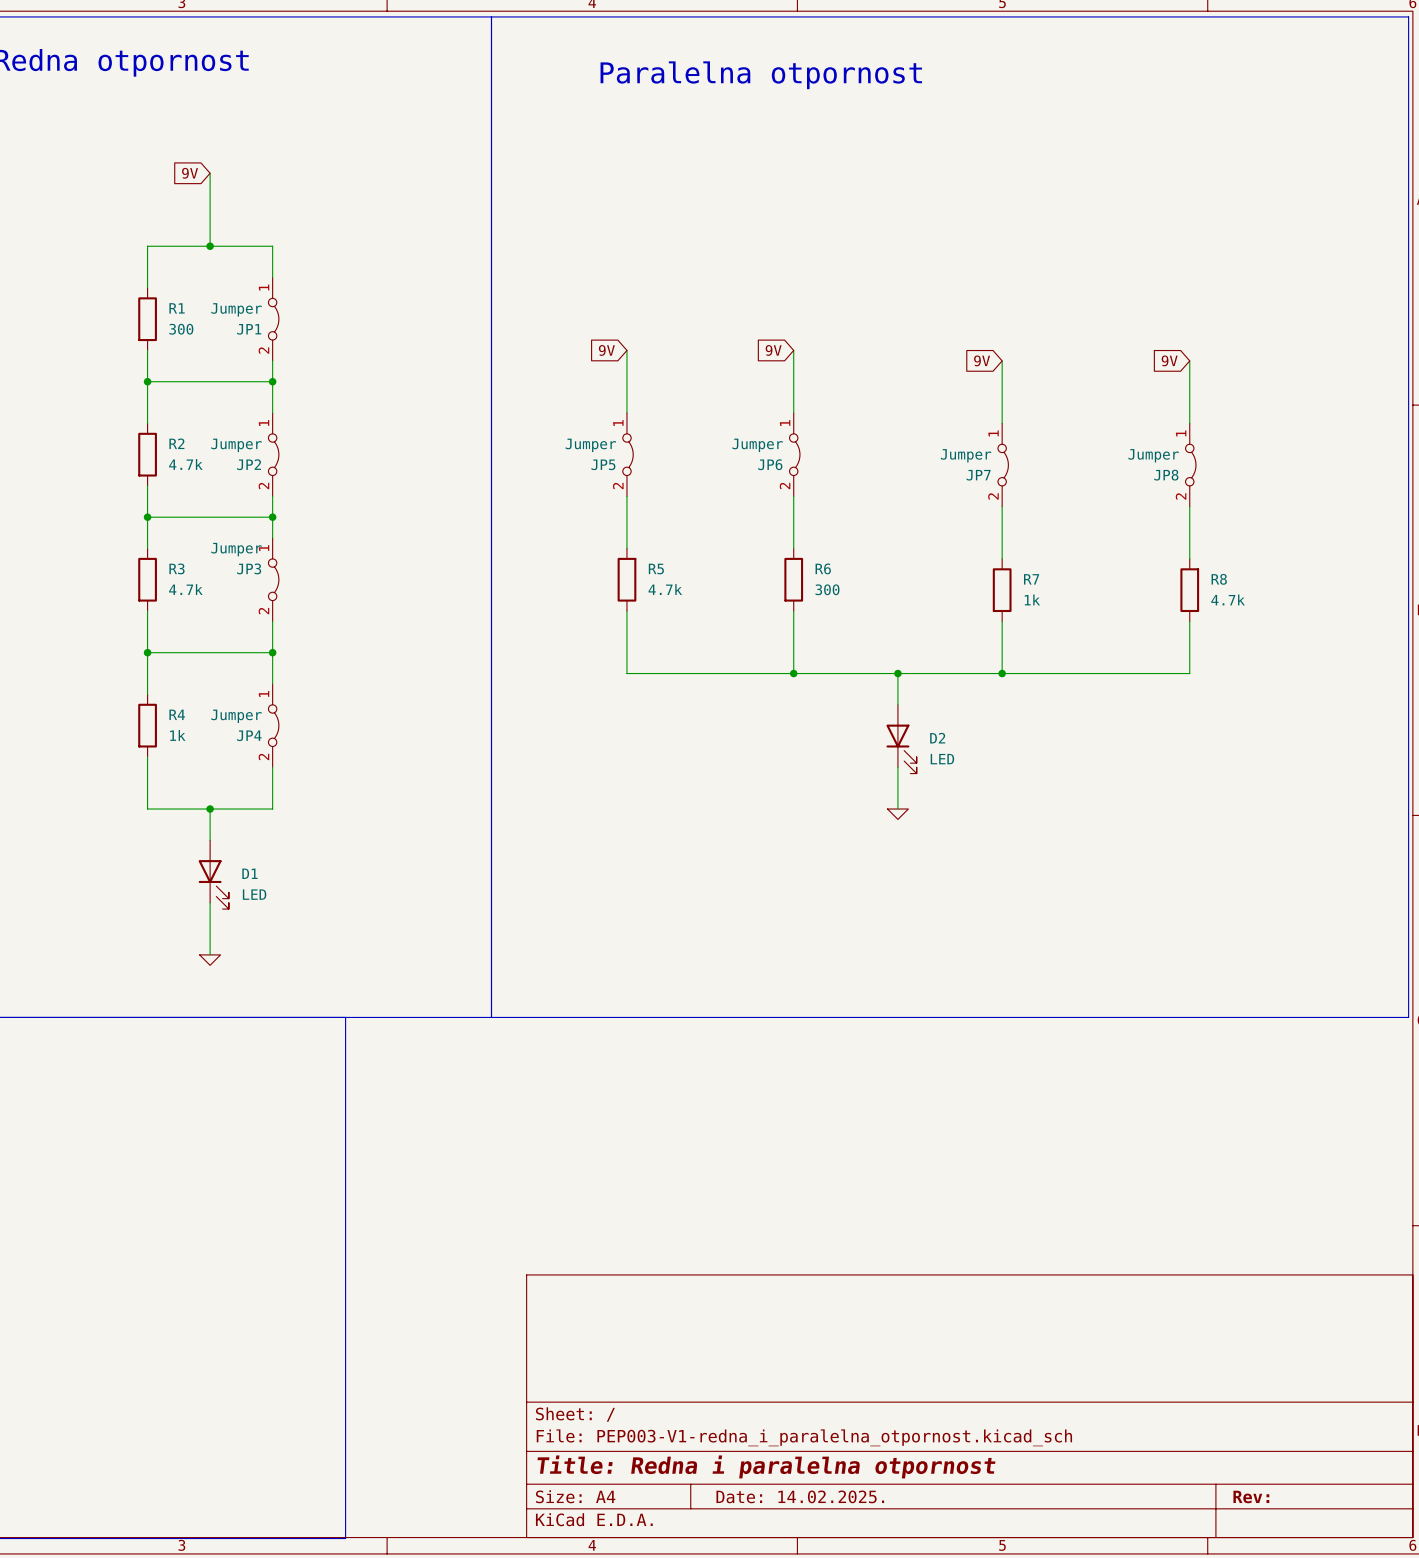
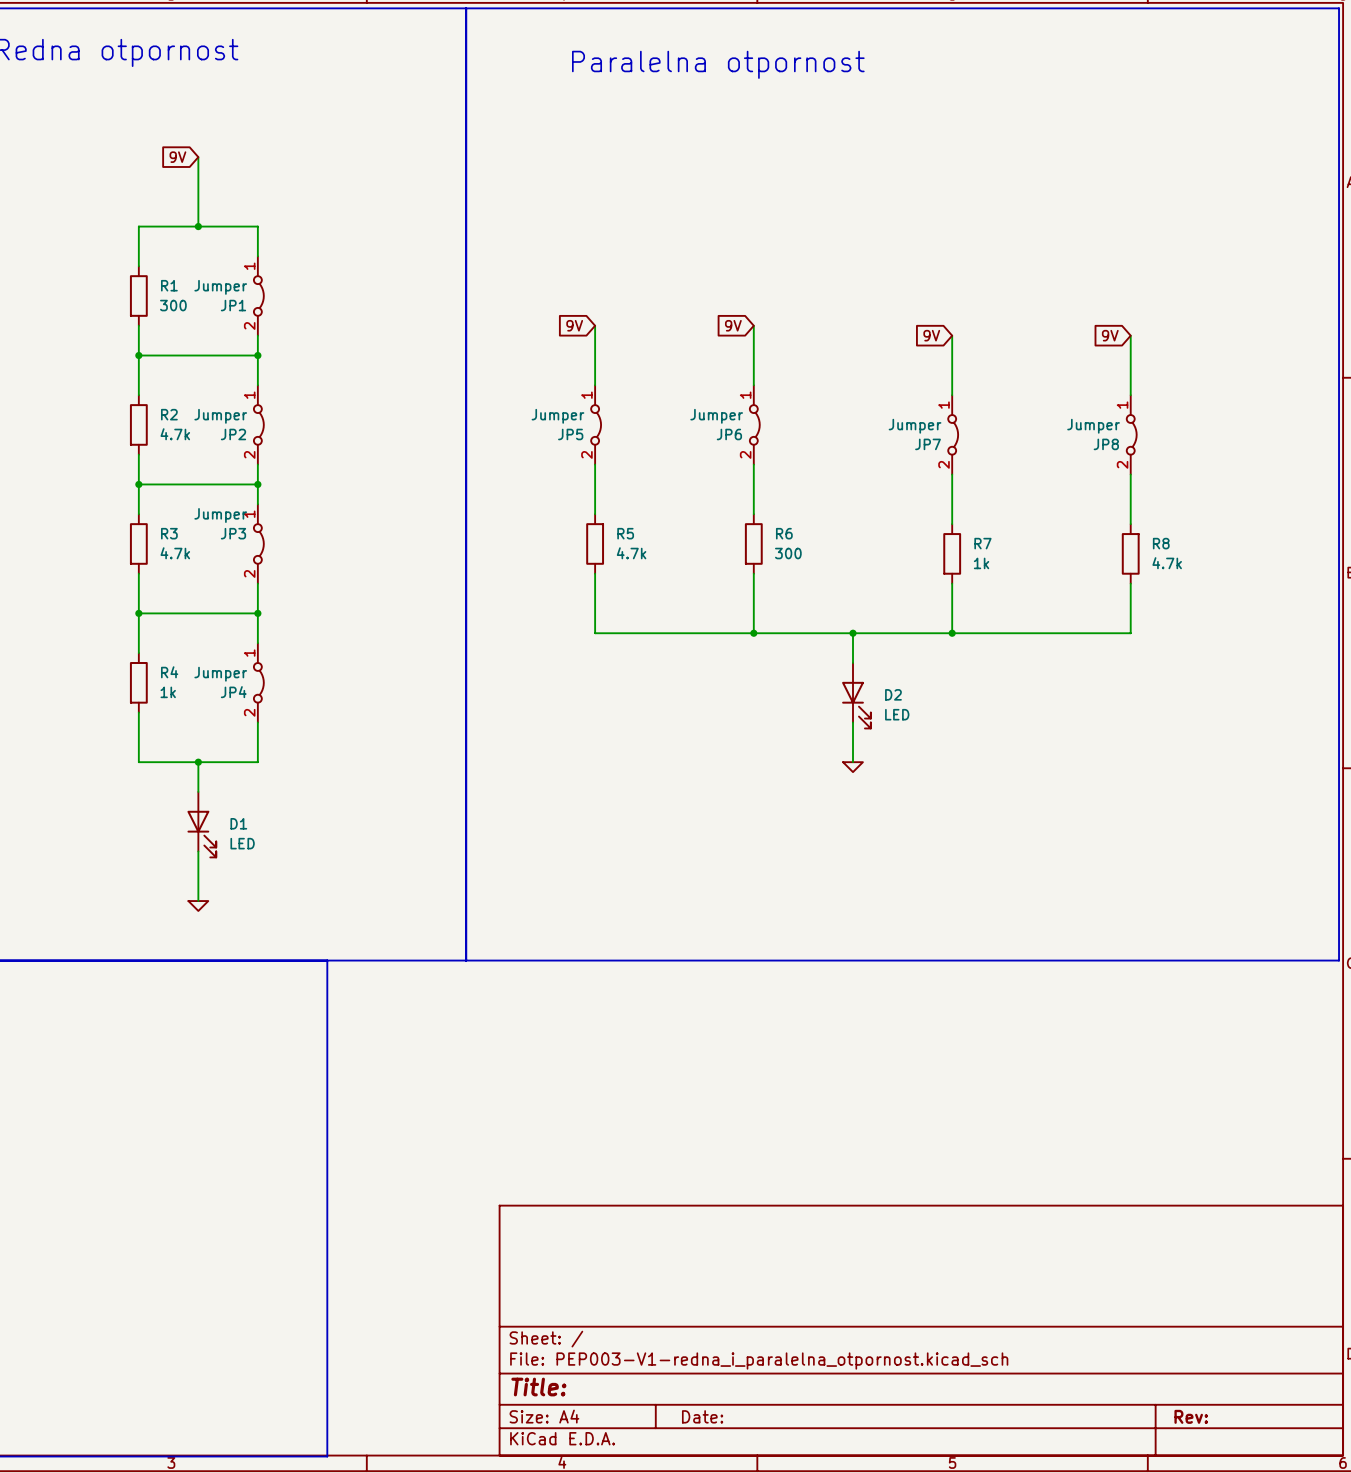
title block: Title: Redna i paralelna otpornost (766, 1466) -> Title: (538, 1387)
title block: Date: 14.02.2025. (800, 1496) -> Date: (702, 1416)

